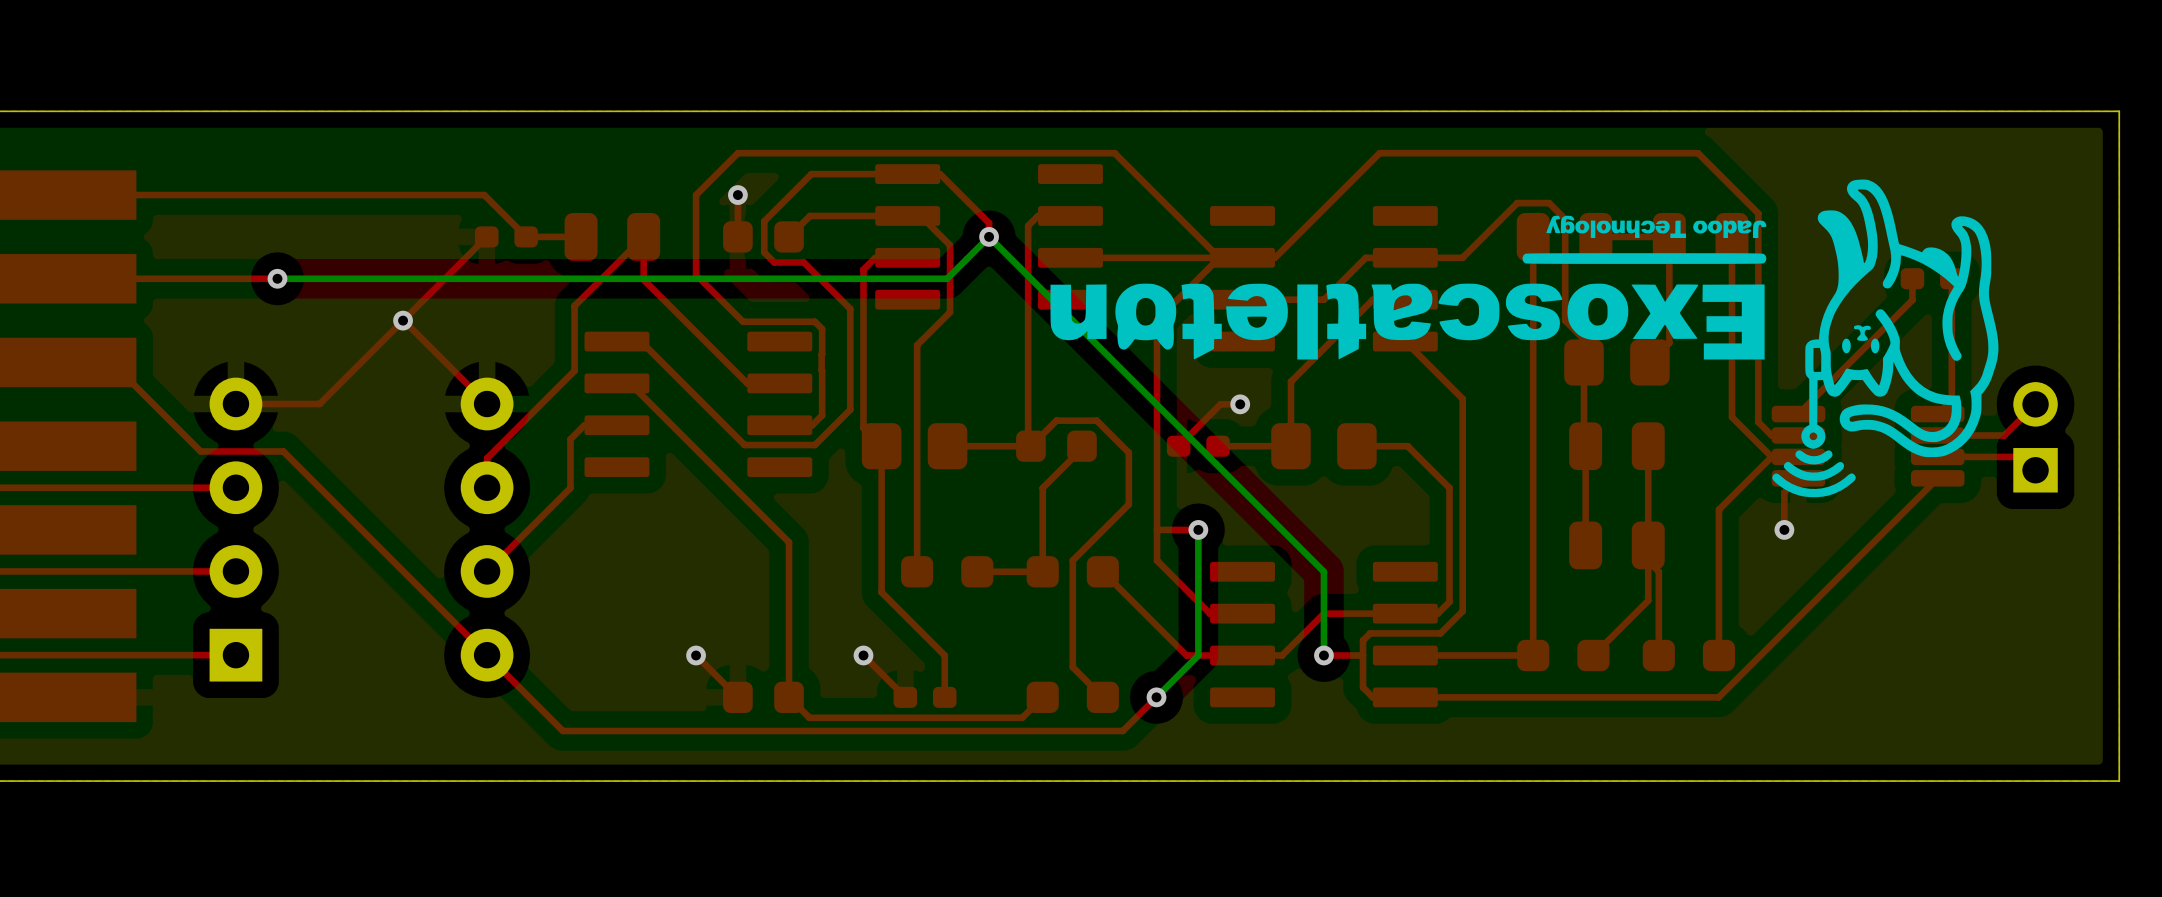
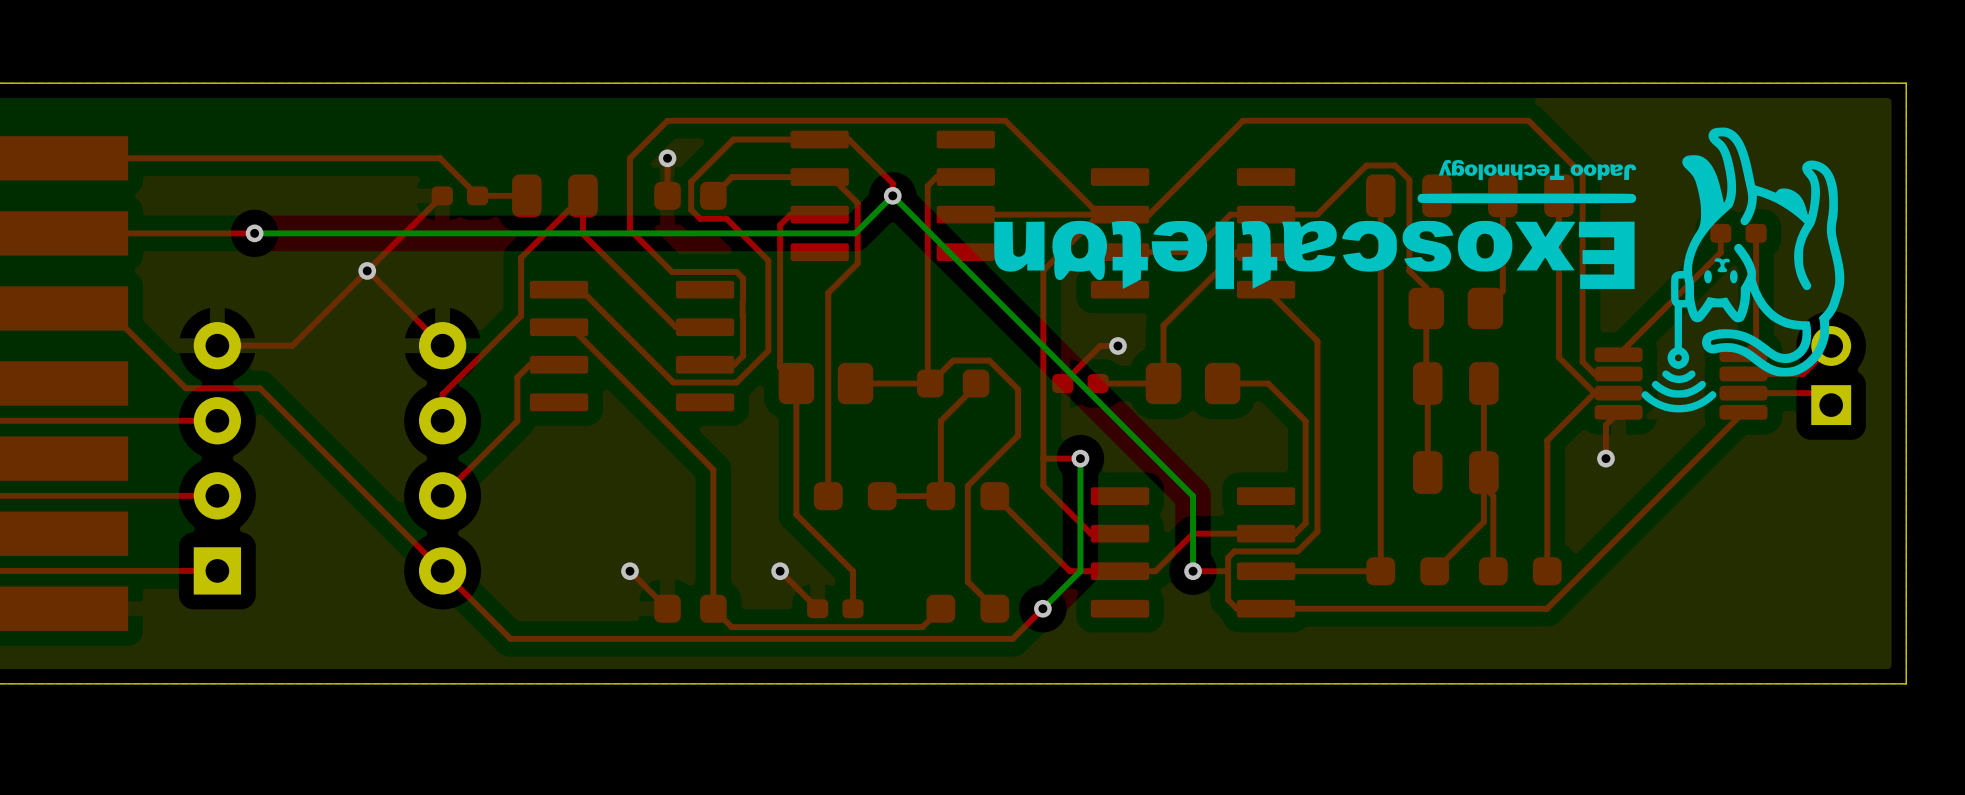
drawing position: (1524, 338) -> (1419, 270)

